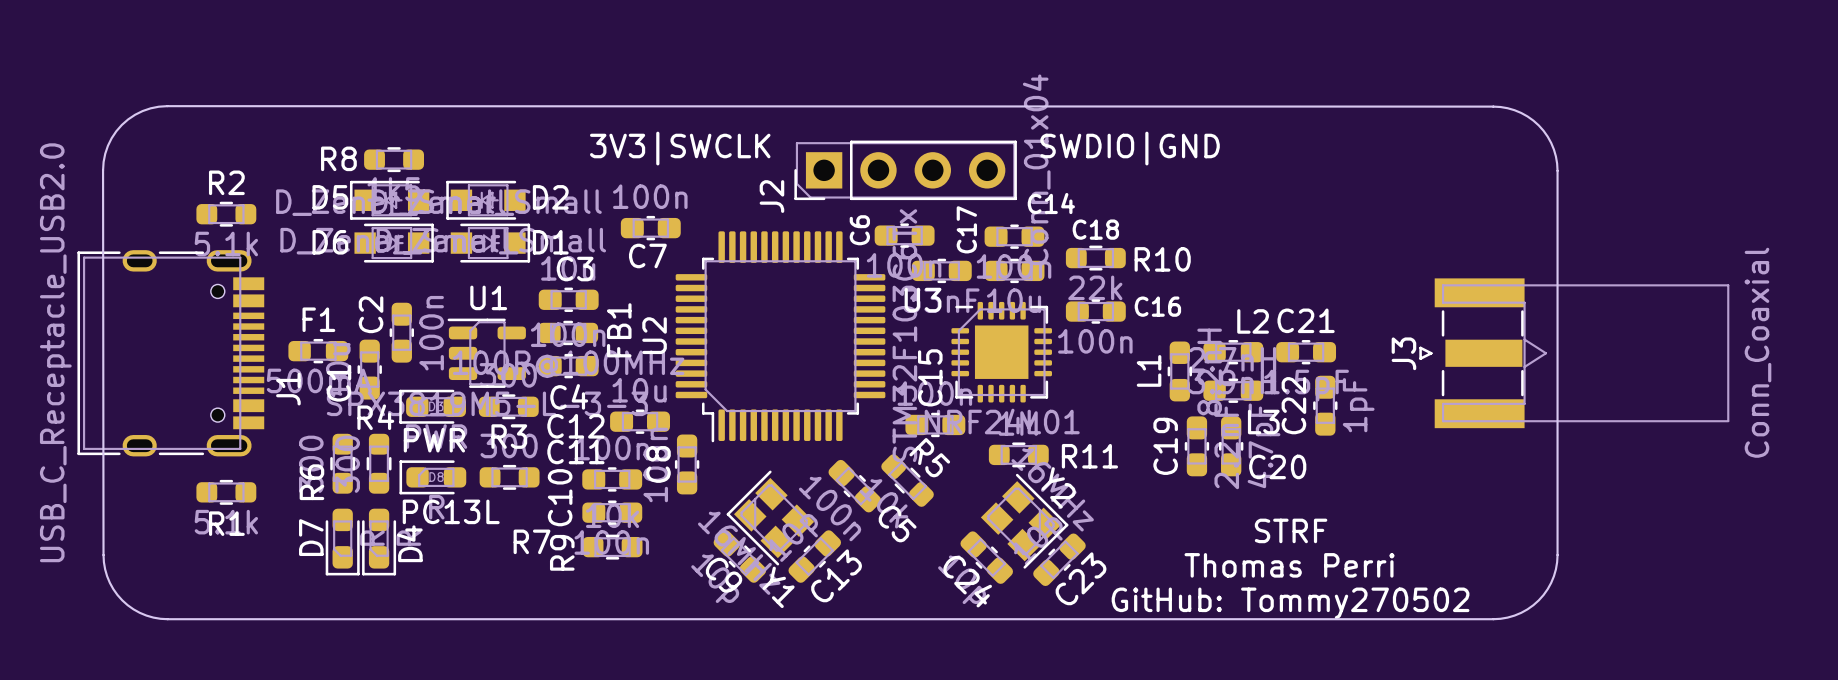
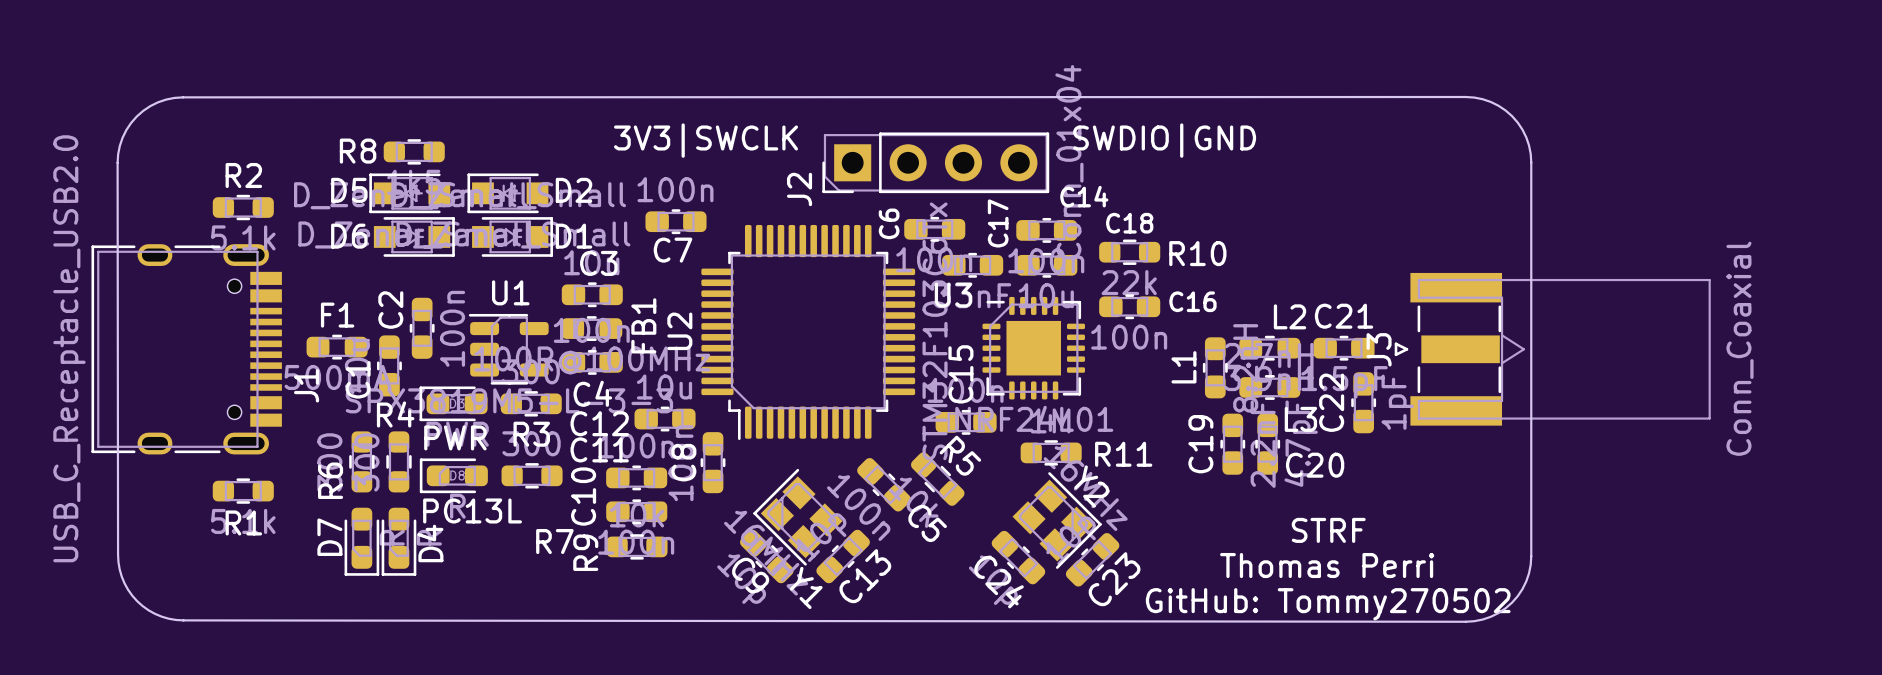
board edge: (167, 106) (1493, 106) (1507, 108) (1521, 112) (1538, 125) (1547, 136) (1553, 149) (1557, 170) (1557, 562) (1553, 576) (1543, 595) (1527, 609) (1514, 615) (1493, 619) (167, 619) -> (183, 97) (1465, 97) (1490, 101) (1512, 116) (1526, 137) (1531, 162) (1530, 564) (1526, 581) (1517, 596) (1505, 608) (1490, 616) (1465, 621) (183, 620)
J3 position: (1574, 353) -> (1552, 349)

